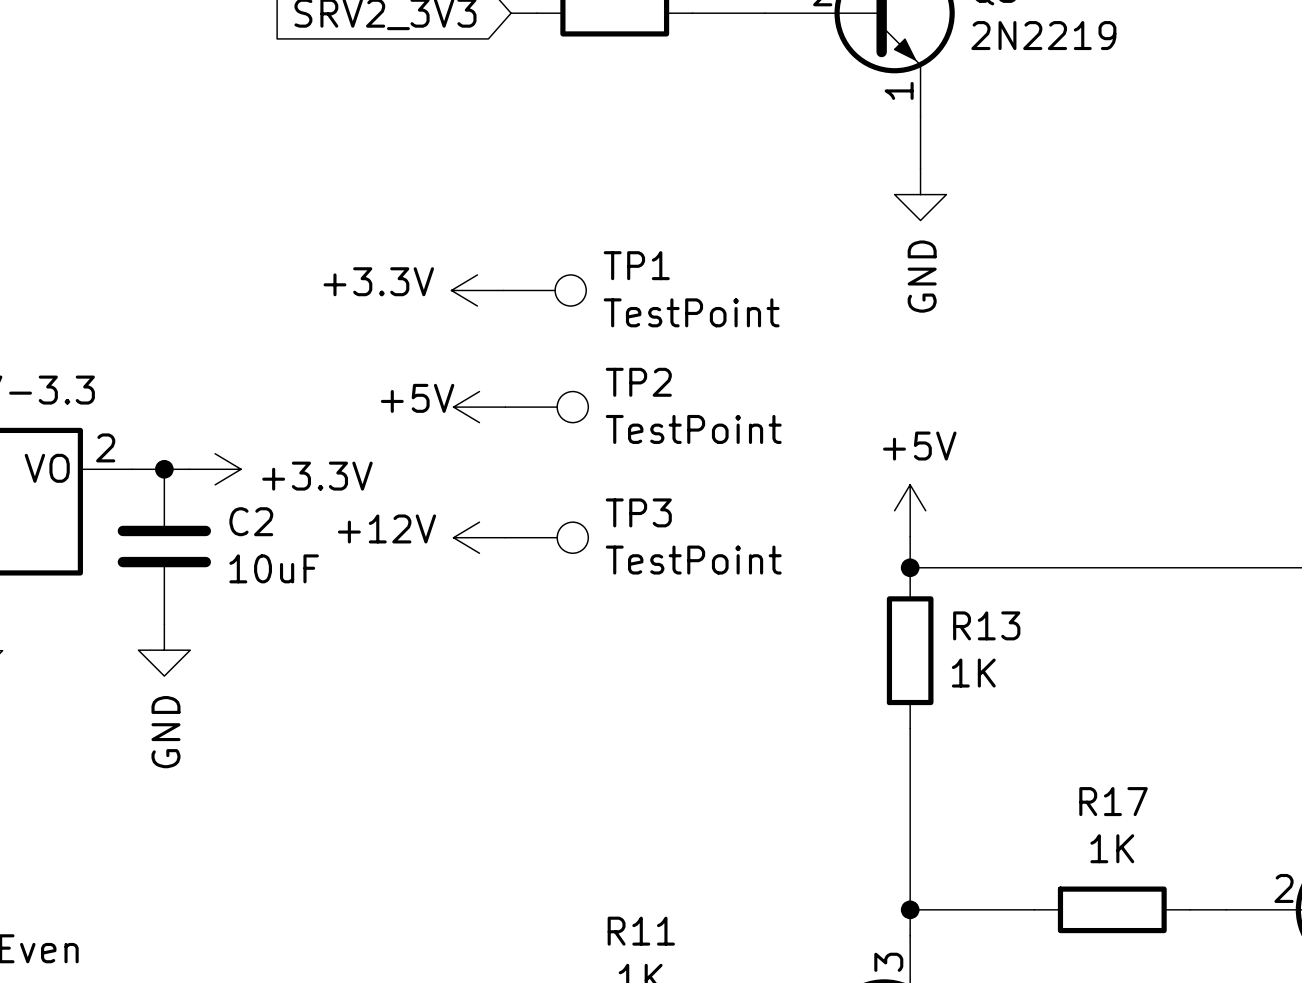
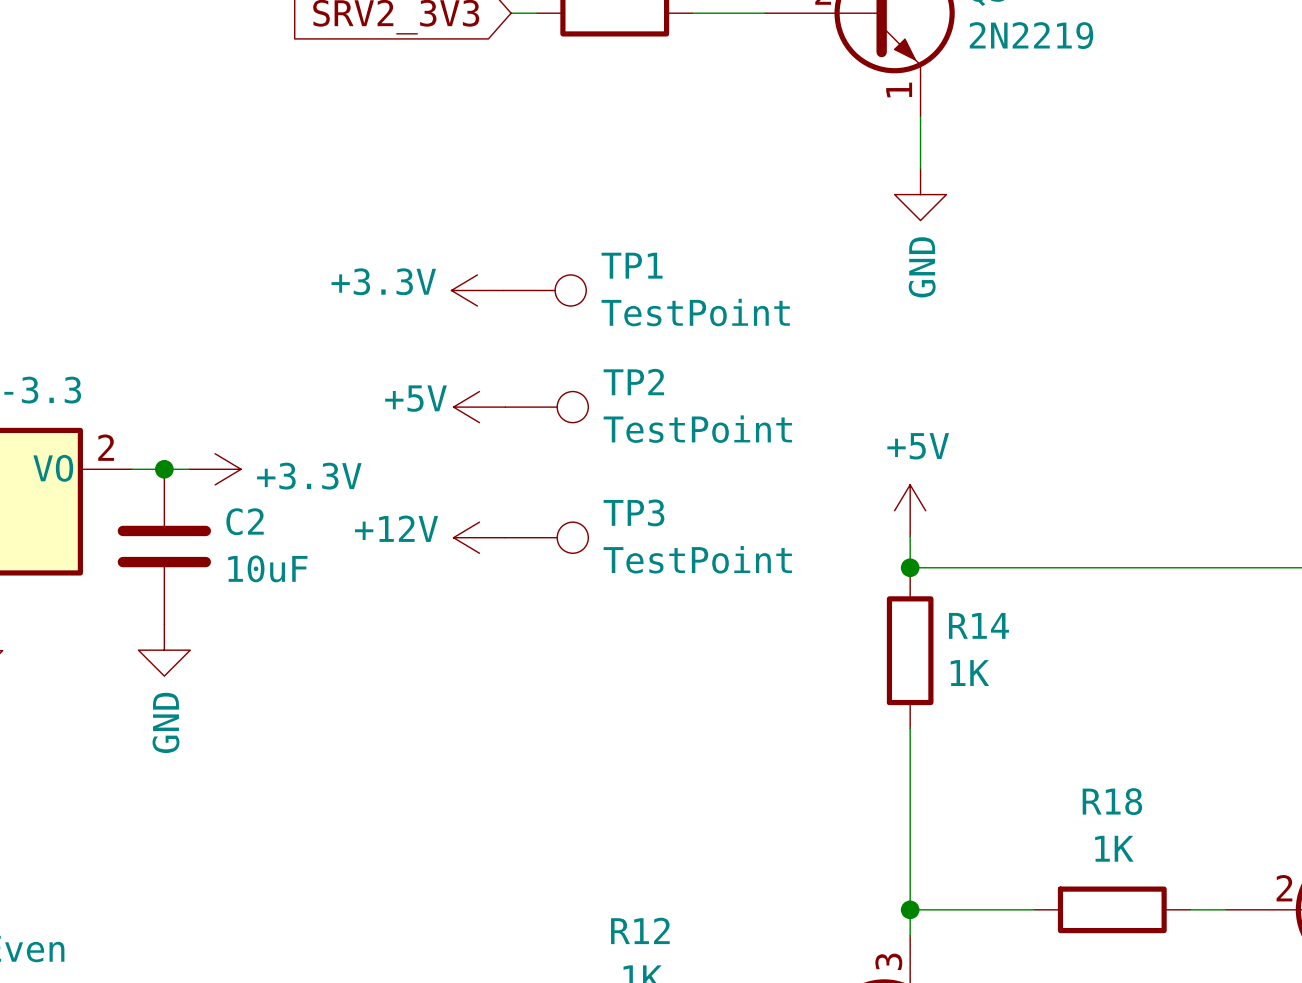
R13 name: R13 (986, 625) -> R14 (978, 625)
R17 name: R17 (1113, 801) -> R18 (1112, 801)
R11 name: R11 (641, 931) -> R12 (640, 930)

